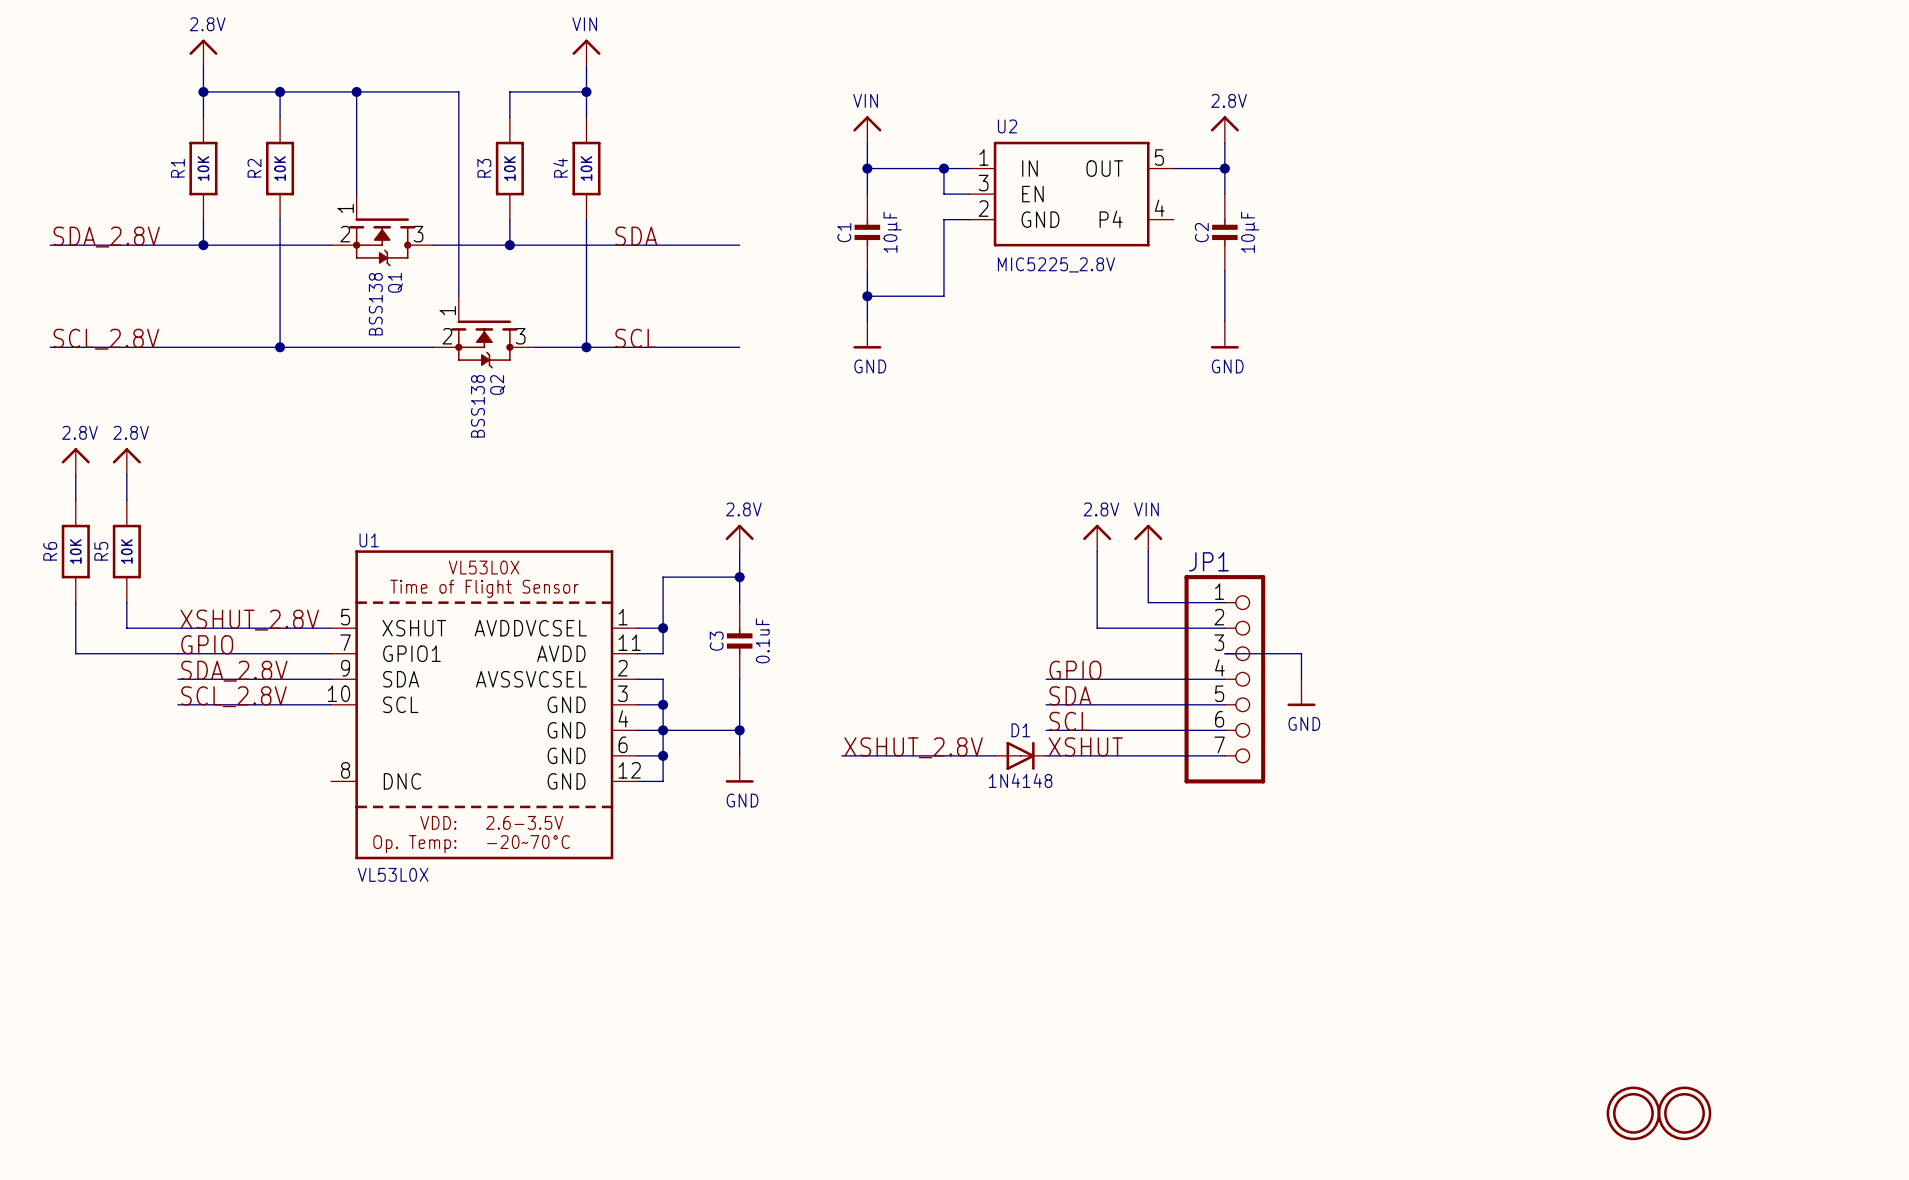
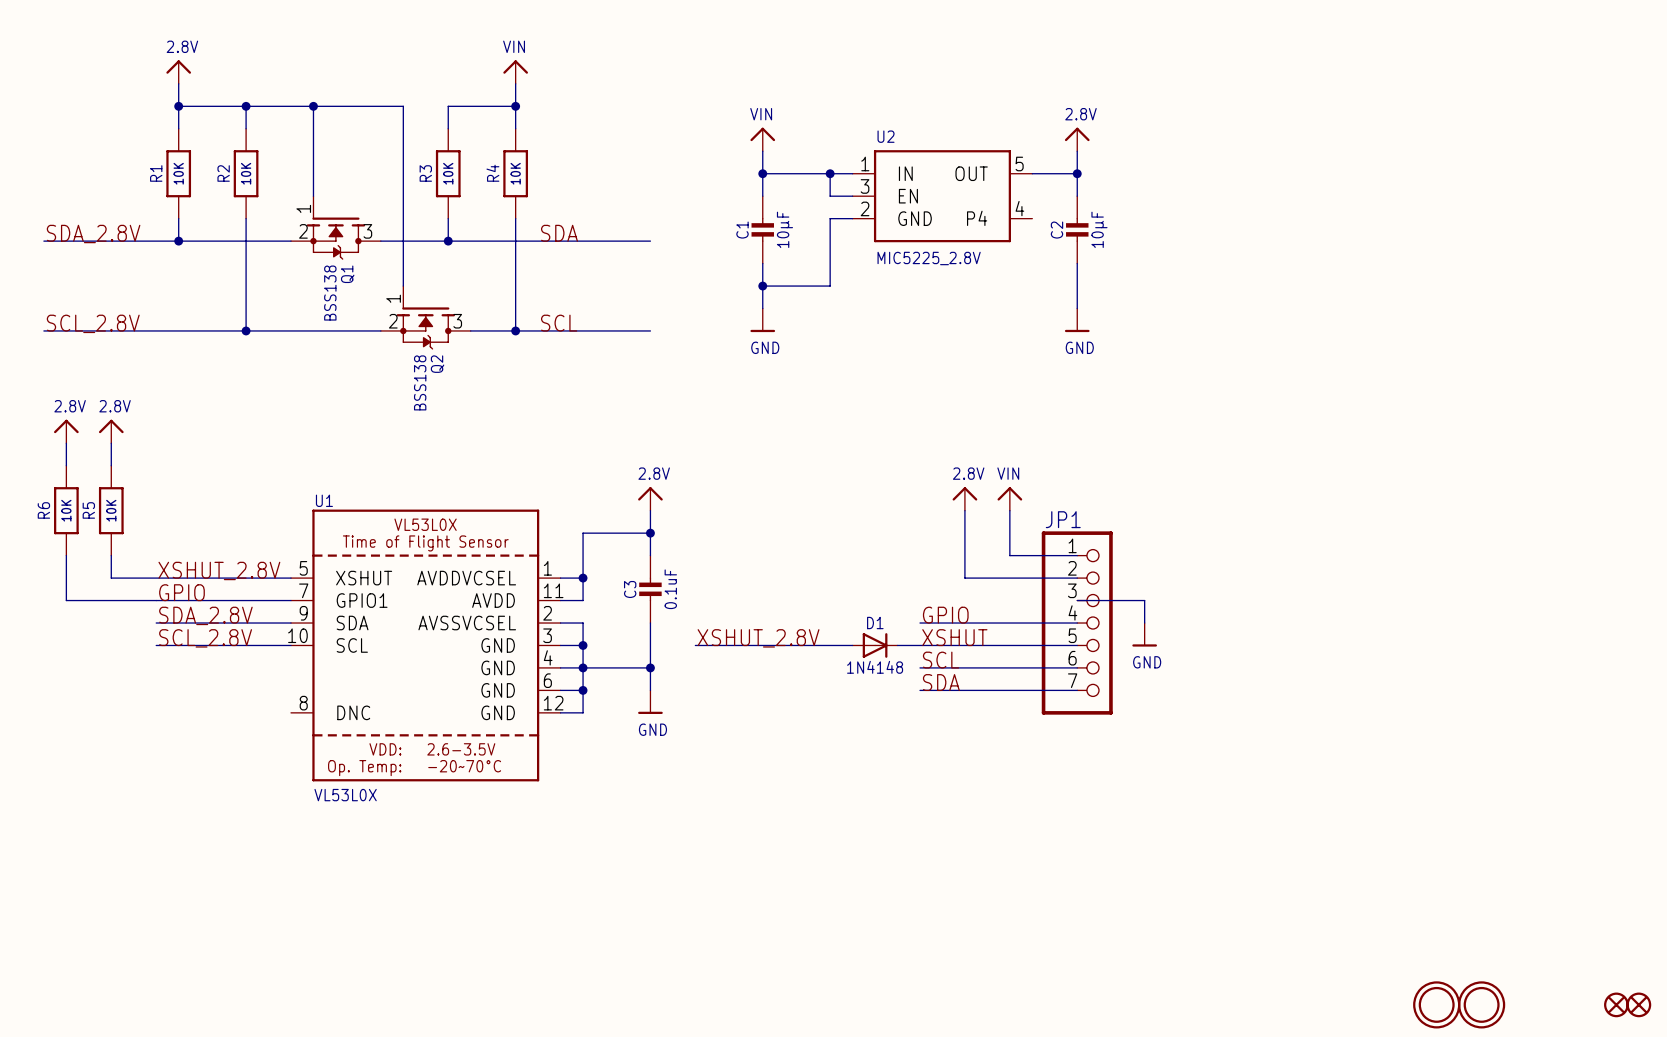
label: SDA (1070, 695) -> XSHUT (954, 637)
wire: none -> (695, 645) (852, 645)
wire: none -> (897, 645) (920, 645)
label: XSHUT (1085, 746) -> SDA (941, 682)
label position: XSHUT_2.8V (913, 747) -> XSHUT_2.8V (758, 638)
wire: (841, 755) (995, 755) -> none
D1 position: (1020, 755) -> (875, 645)
part: none -> (1616, 1004)
part: none -> (1638, 1004)

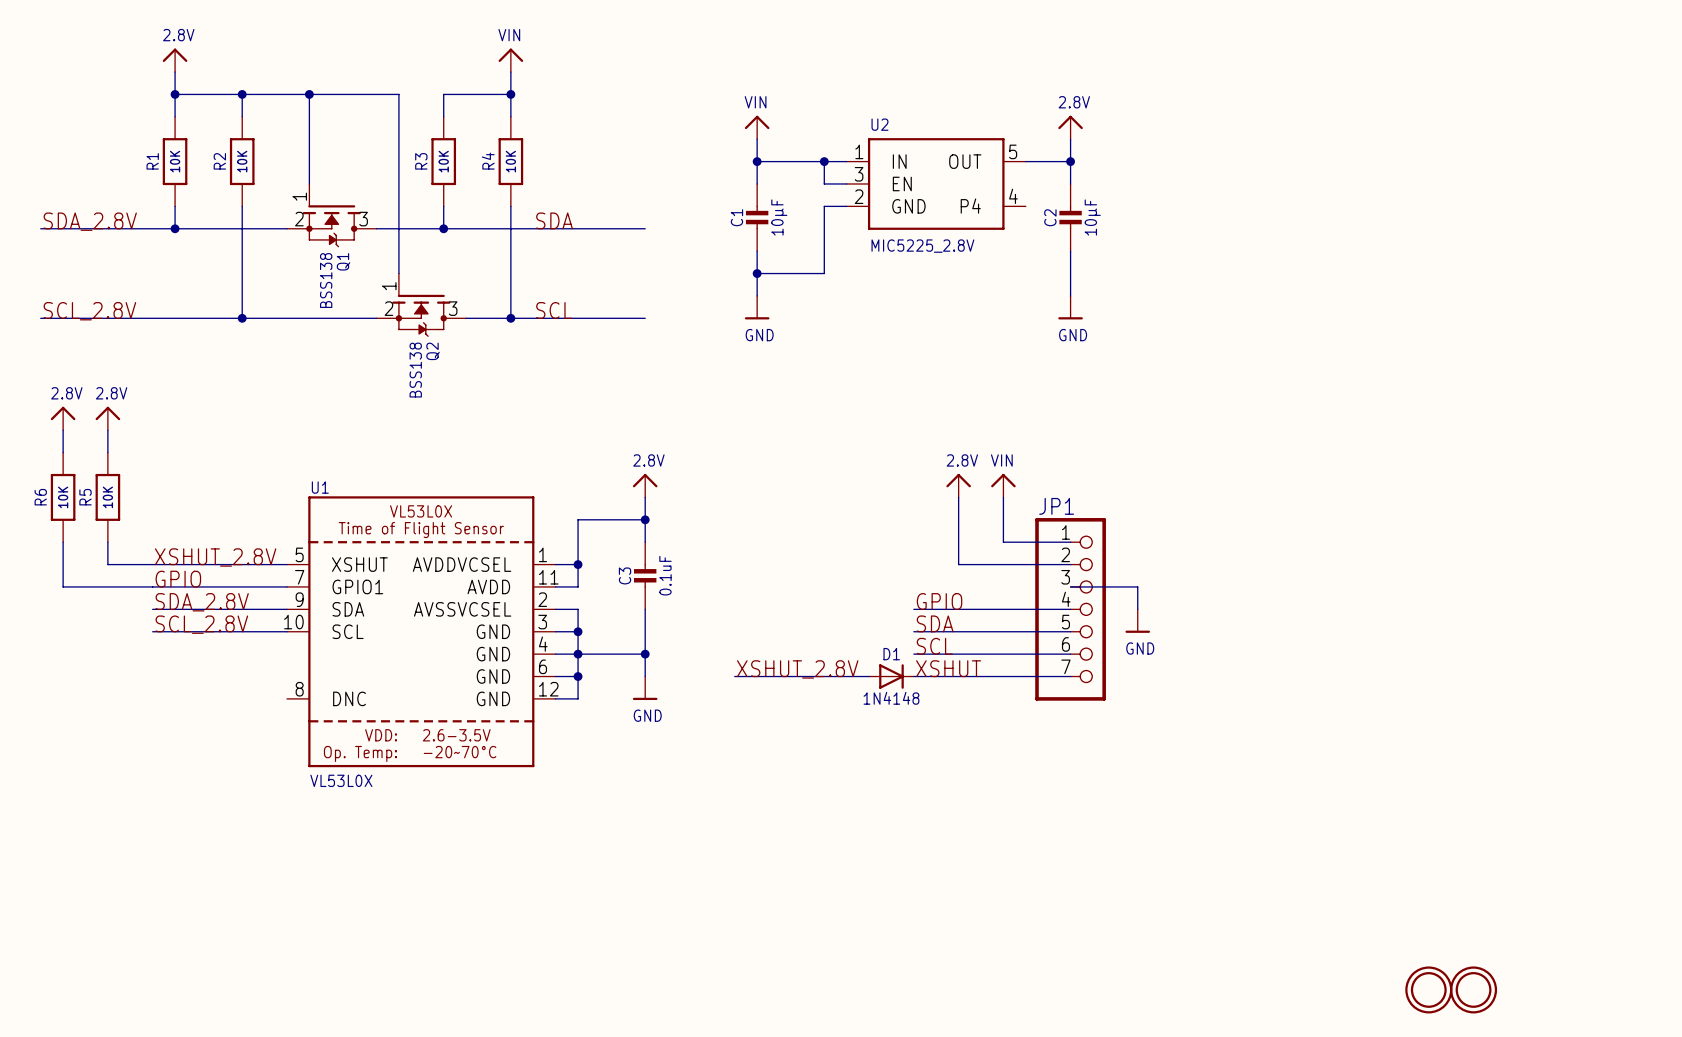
label: XSHUT (954, 637) -> SDA (935, 623)
label position: XSHUT_2.8V (758, 638) -> XSHUT_2.8V (797, 669)
wire: (695, 645) (852, 645) -> none
D1 position: (875, 645) -> (891, 676)
wire: (897, 645) (920, 645) -> none
label: SDA (941, 682) -> XSHUT (948, 668)
wire: none -> (734, 676) (869, 676)
part: (1616, 1004) -> none
part: (1638, 1004) -> none

